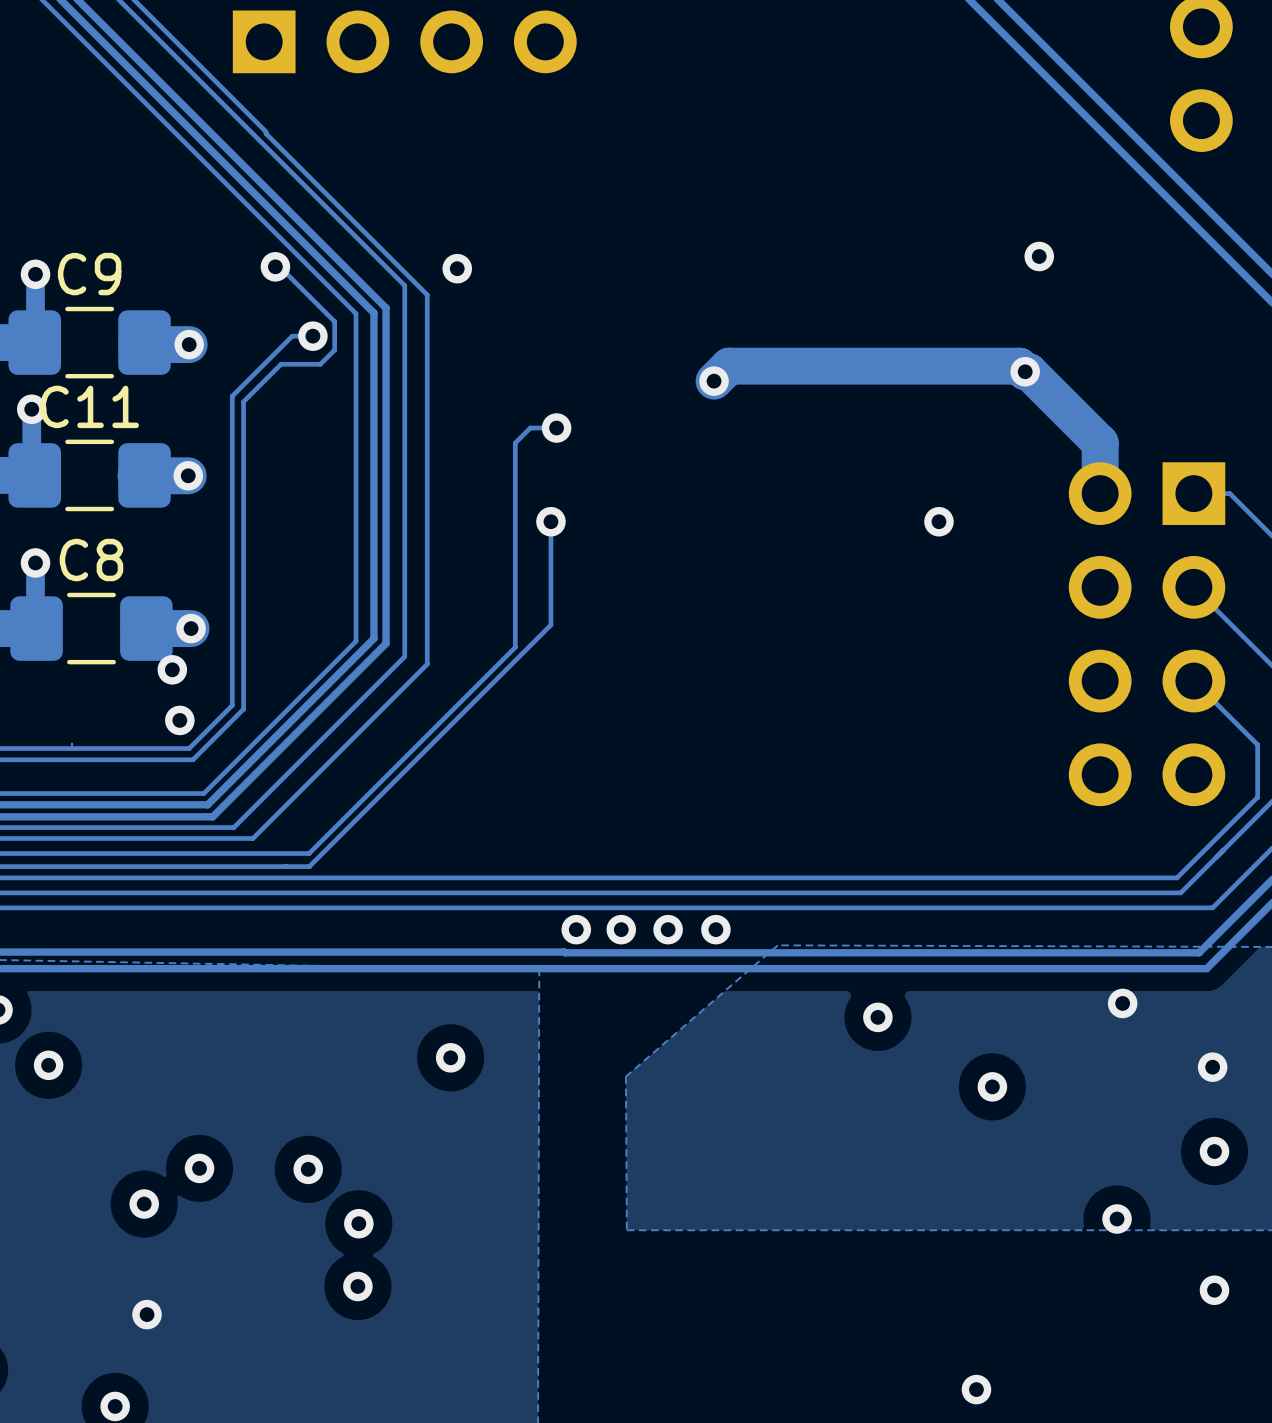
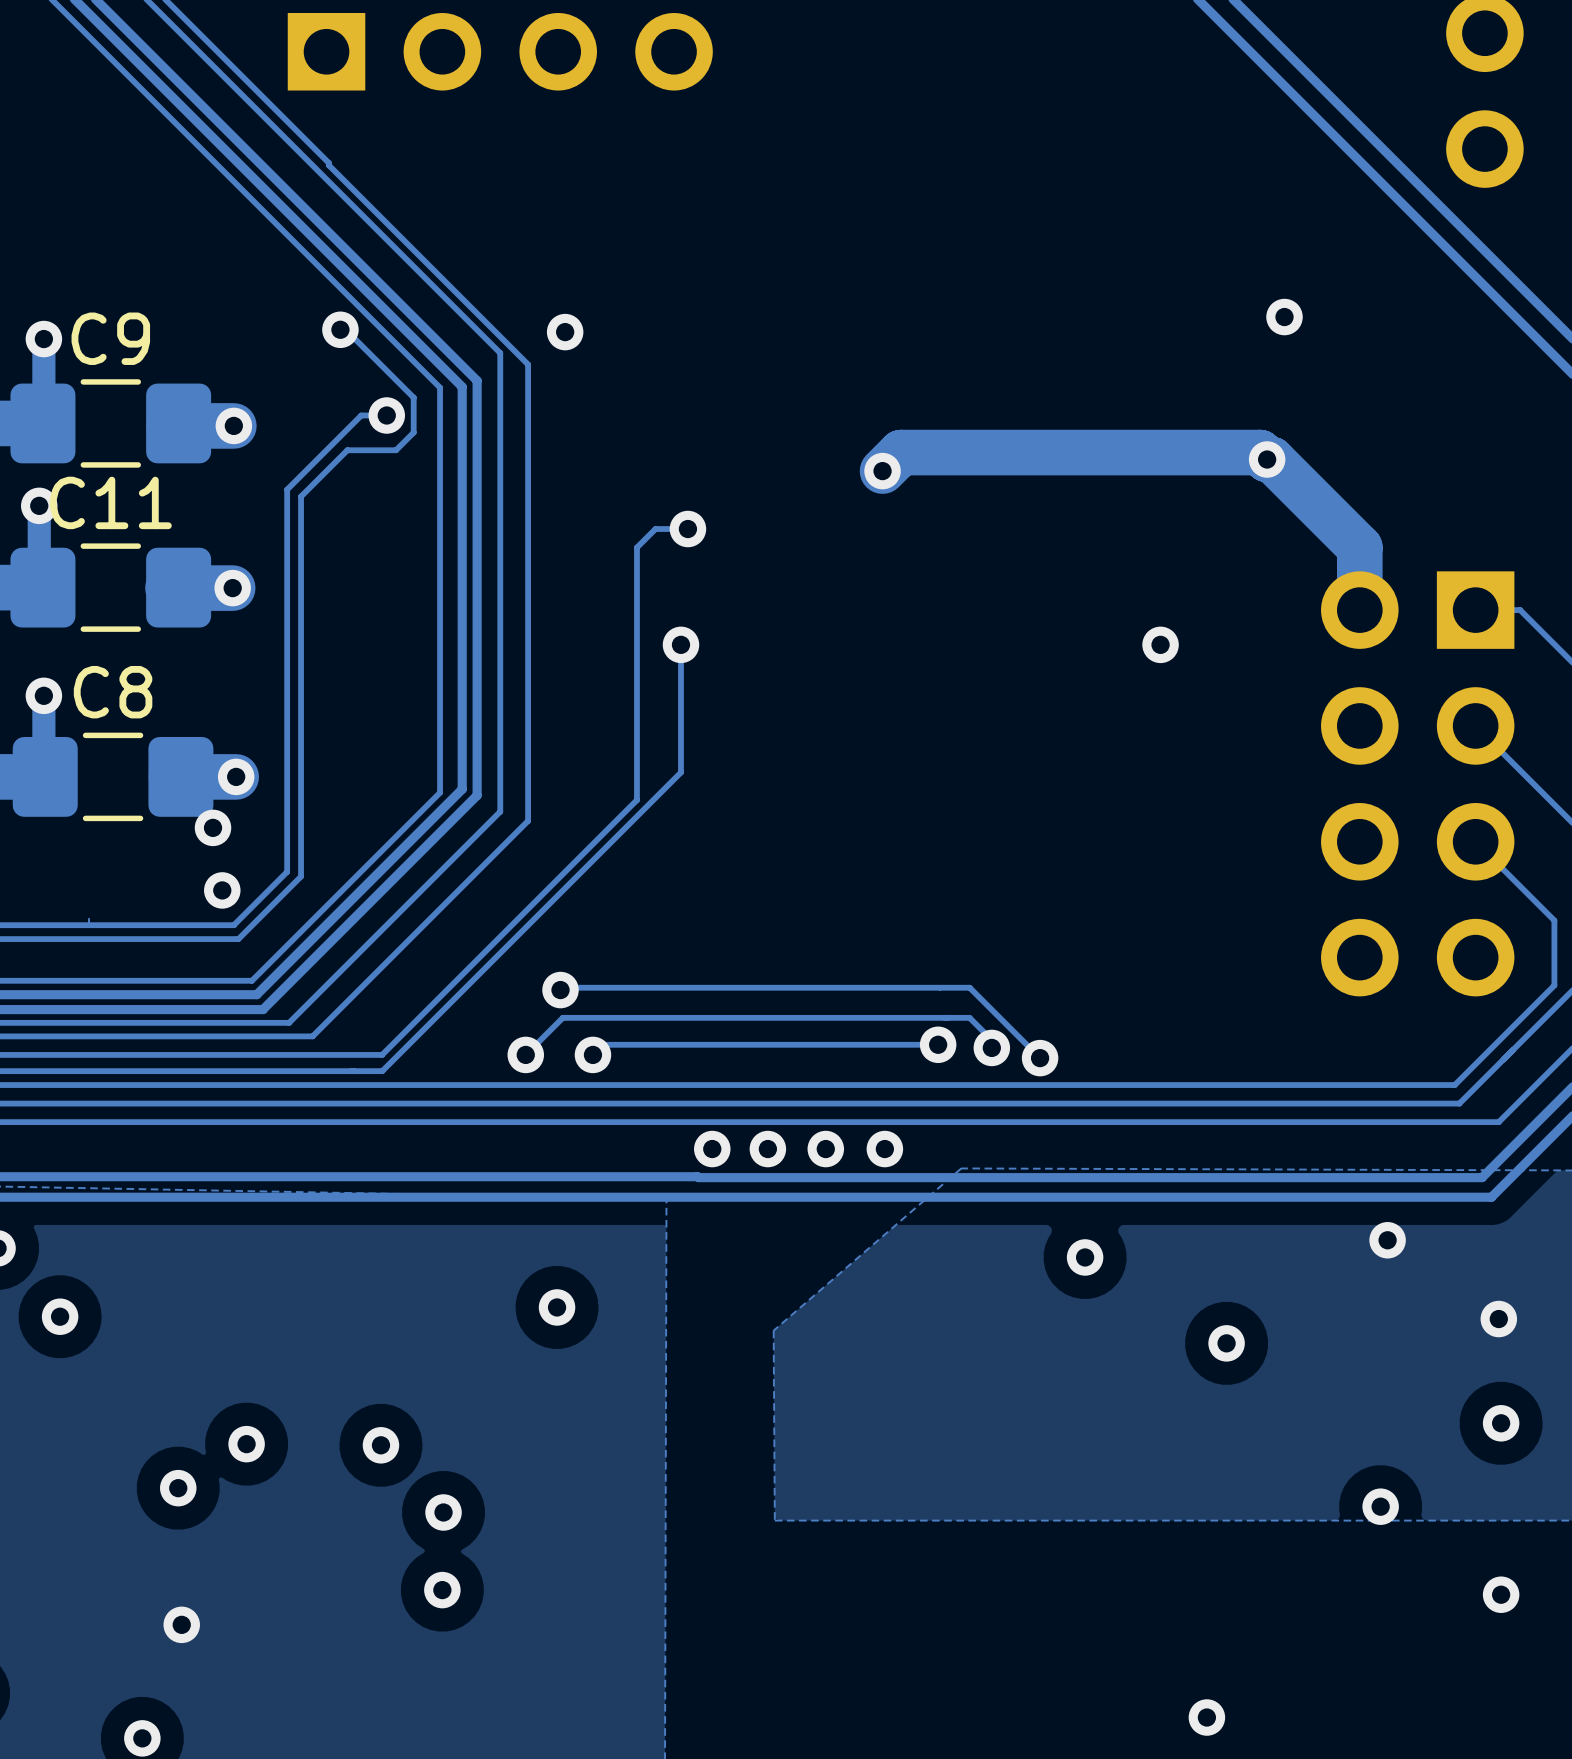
track: none -> (940, 987) (969, 987) (1040, 1058)
track: none -> (939, 987) (562, 987) (560, 990)
via: none -> (560, 990)
track: none -> (938, 1044) (603, 1044) (592, 1054)
via: none -> (938, 1044)
track: none -> (991, 1047) (991, 1040) (969, 1017) (562, 1017) (525, 1054)
via: none -> (991, 1047)
via: none -> (525, 1054)
via: none -> (592, 1054)
via: none -> (1040, 1058)

